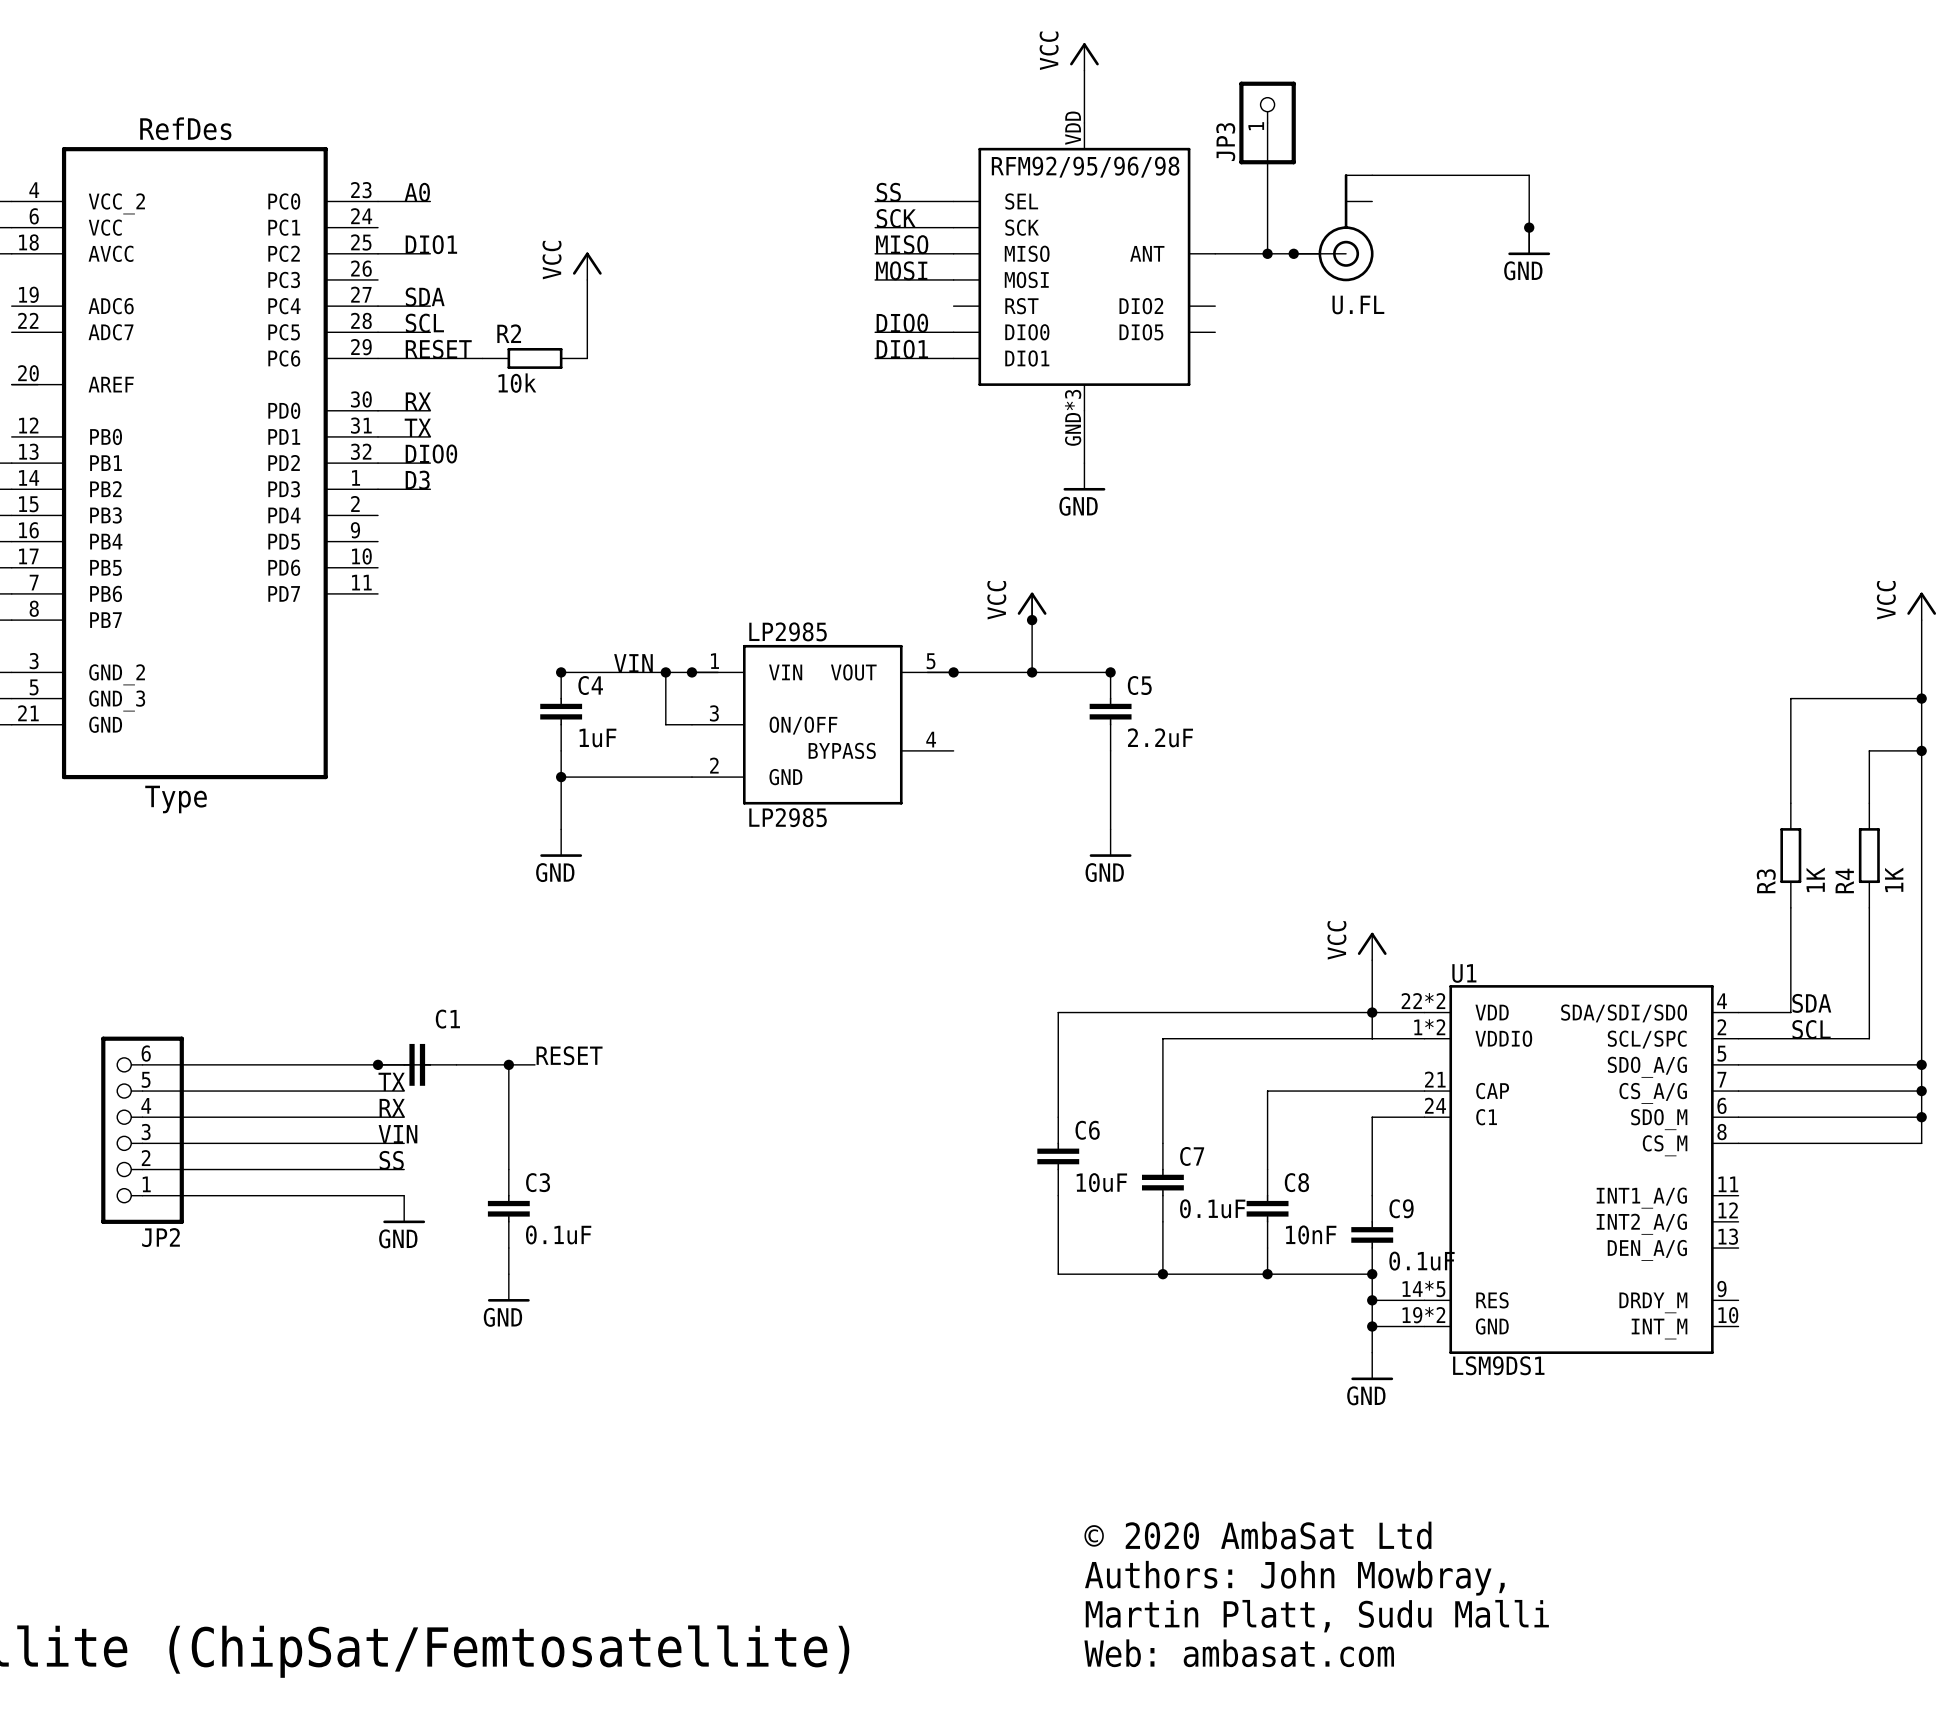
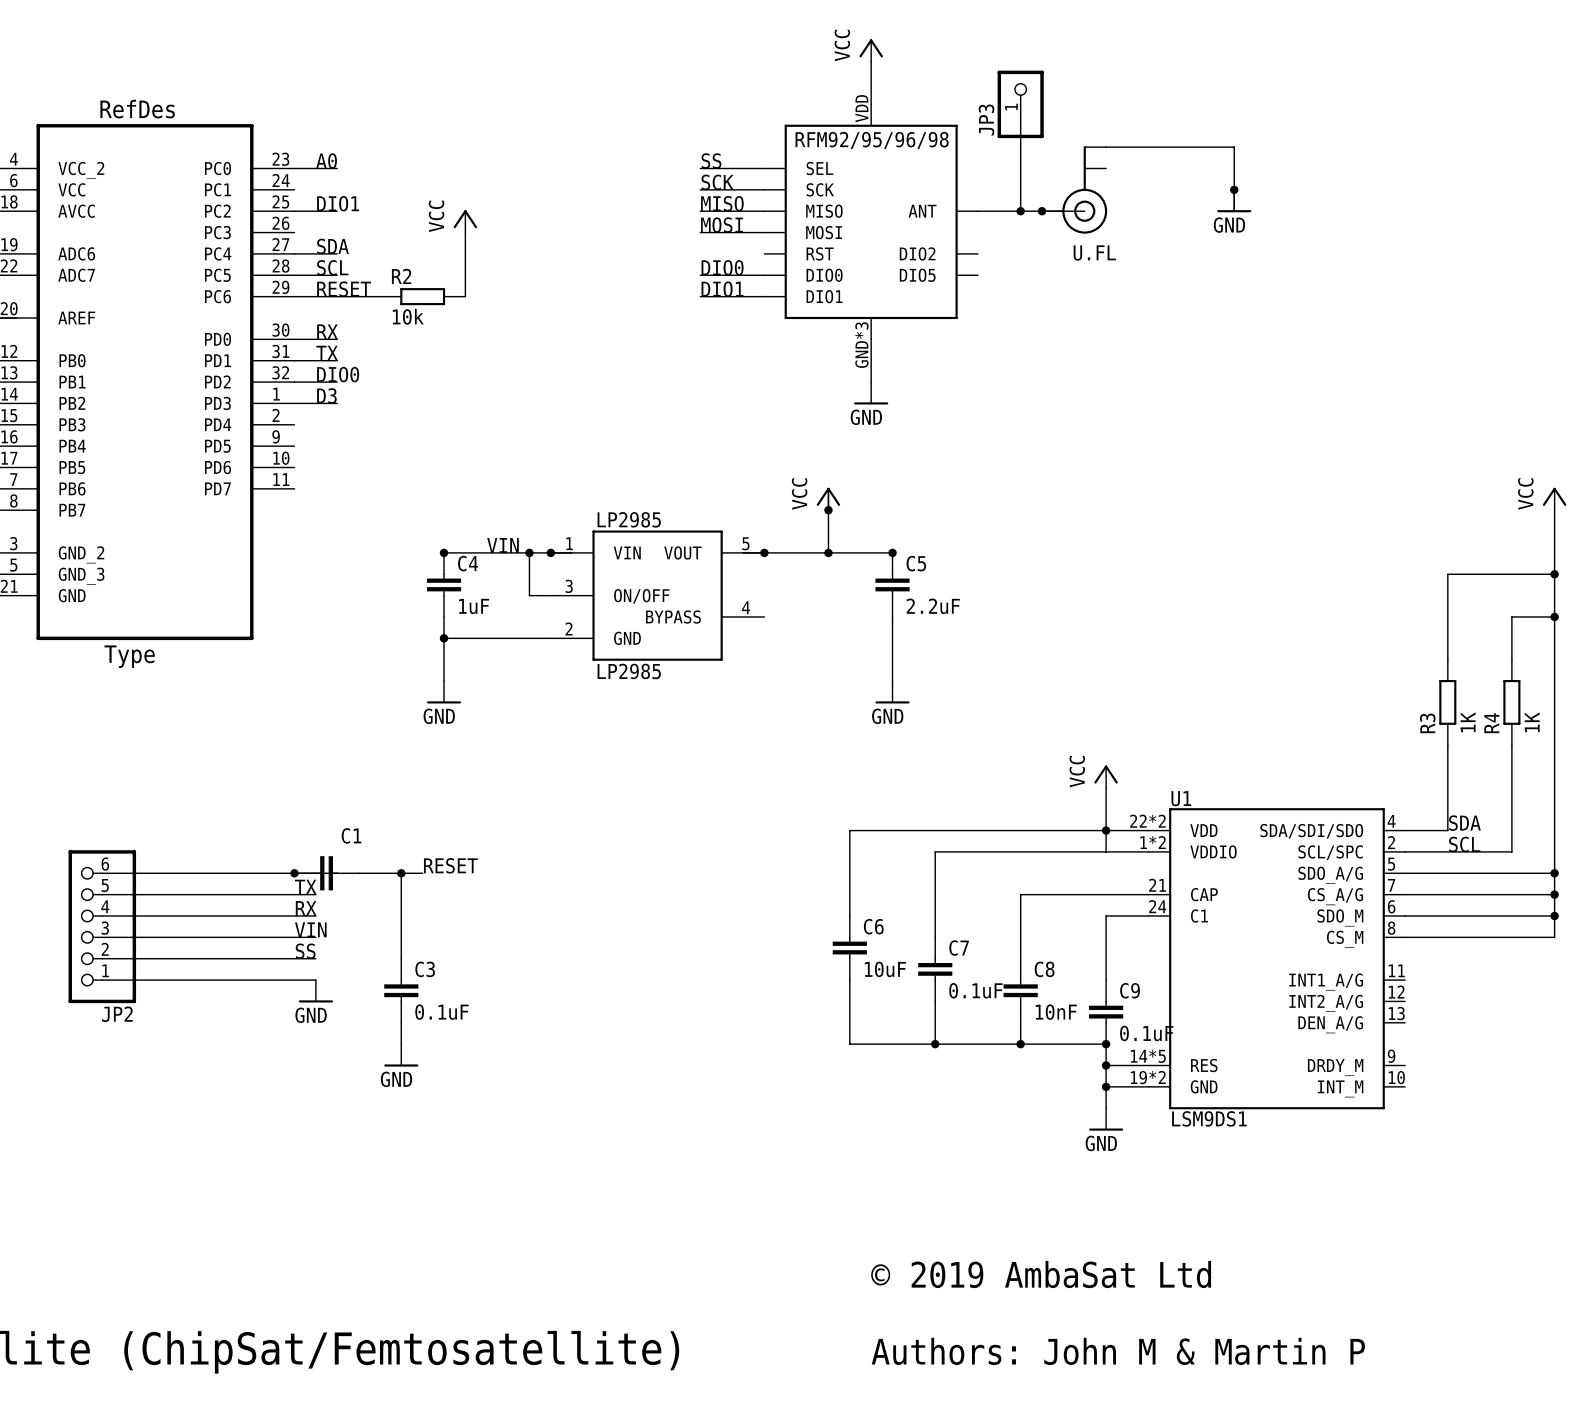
text: © 2020 AmbaSat Ltd (1257, 1535) -> © 2019 AmbaSat Ltd (1041, 1274)
text: Authors: John Mowbray, (1294, 1578) -> none
text: Martin Platt, Sudu Malli (1317, 1616) -> none
text: Web: ambasat.com (1239, 1653) -> Authors: John M & Martin P (1118, 1351)

